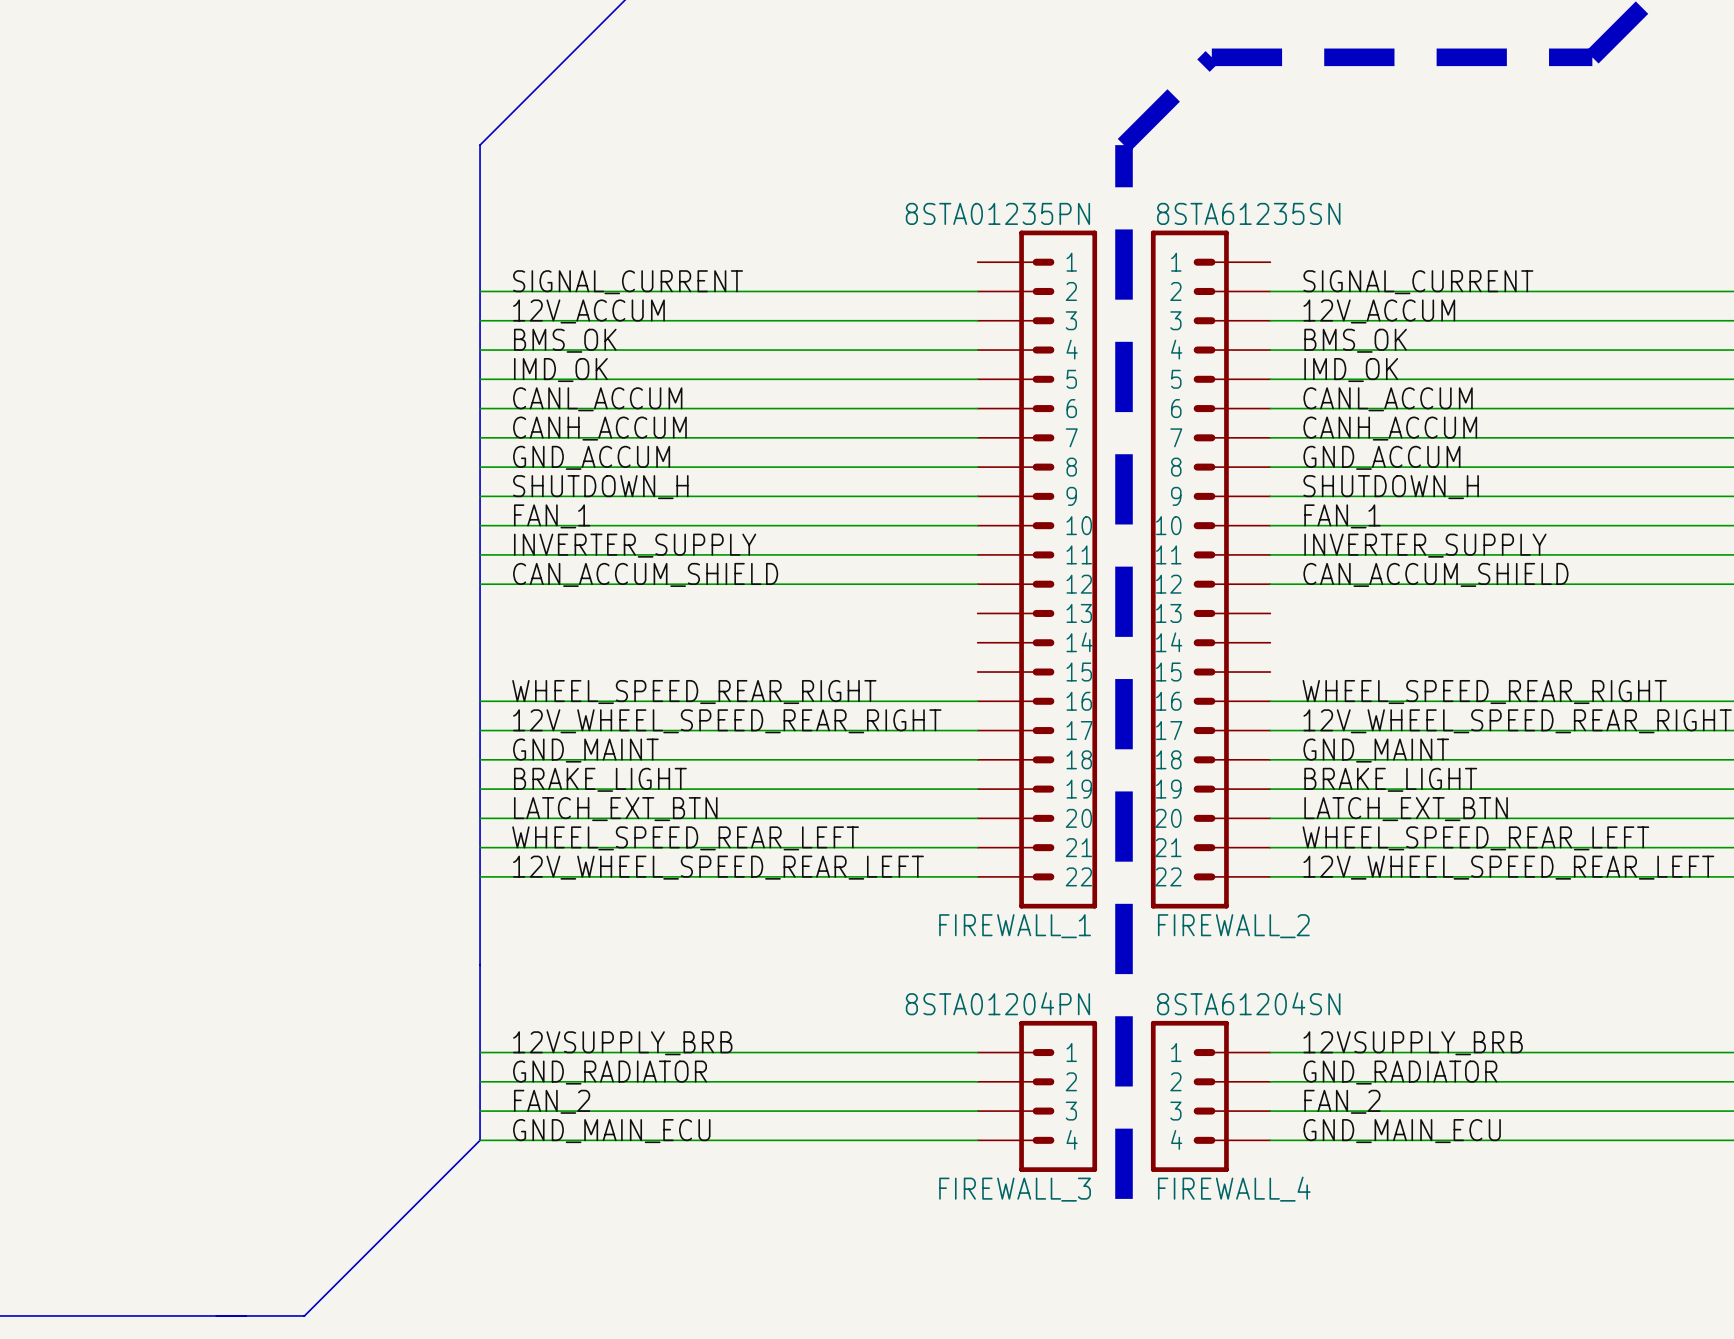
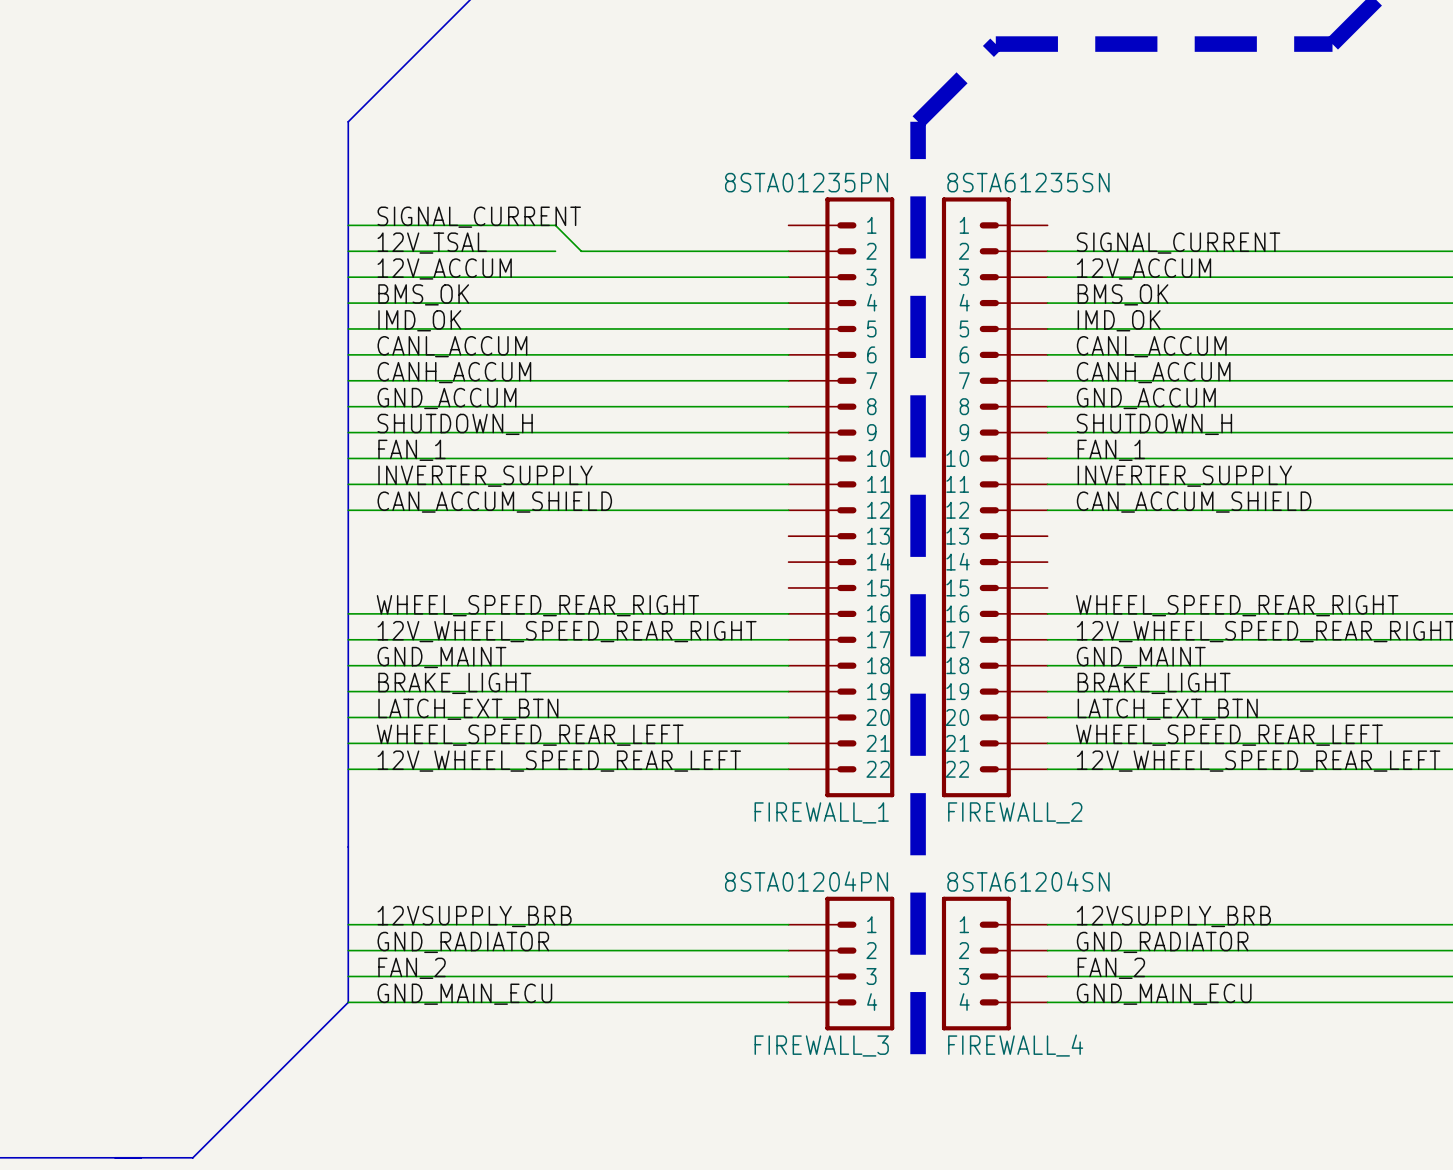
label: none -> SIGNAL_CURRENT (479, 217)
label: SIGNAL_CURRENT (628, 282) -> 12V_TSAL (432, 243)
wire: (714, 291) (743, 291) -> (348, 225) (555, 225) (581, 251)

